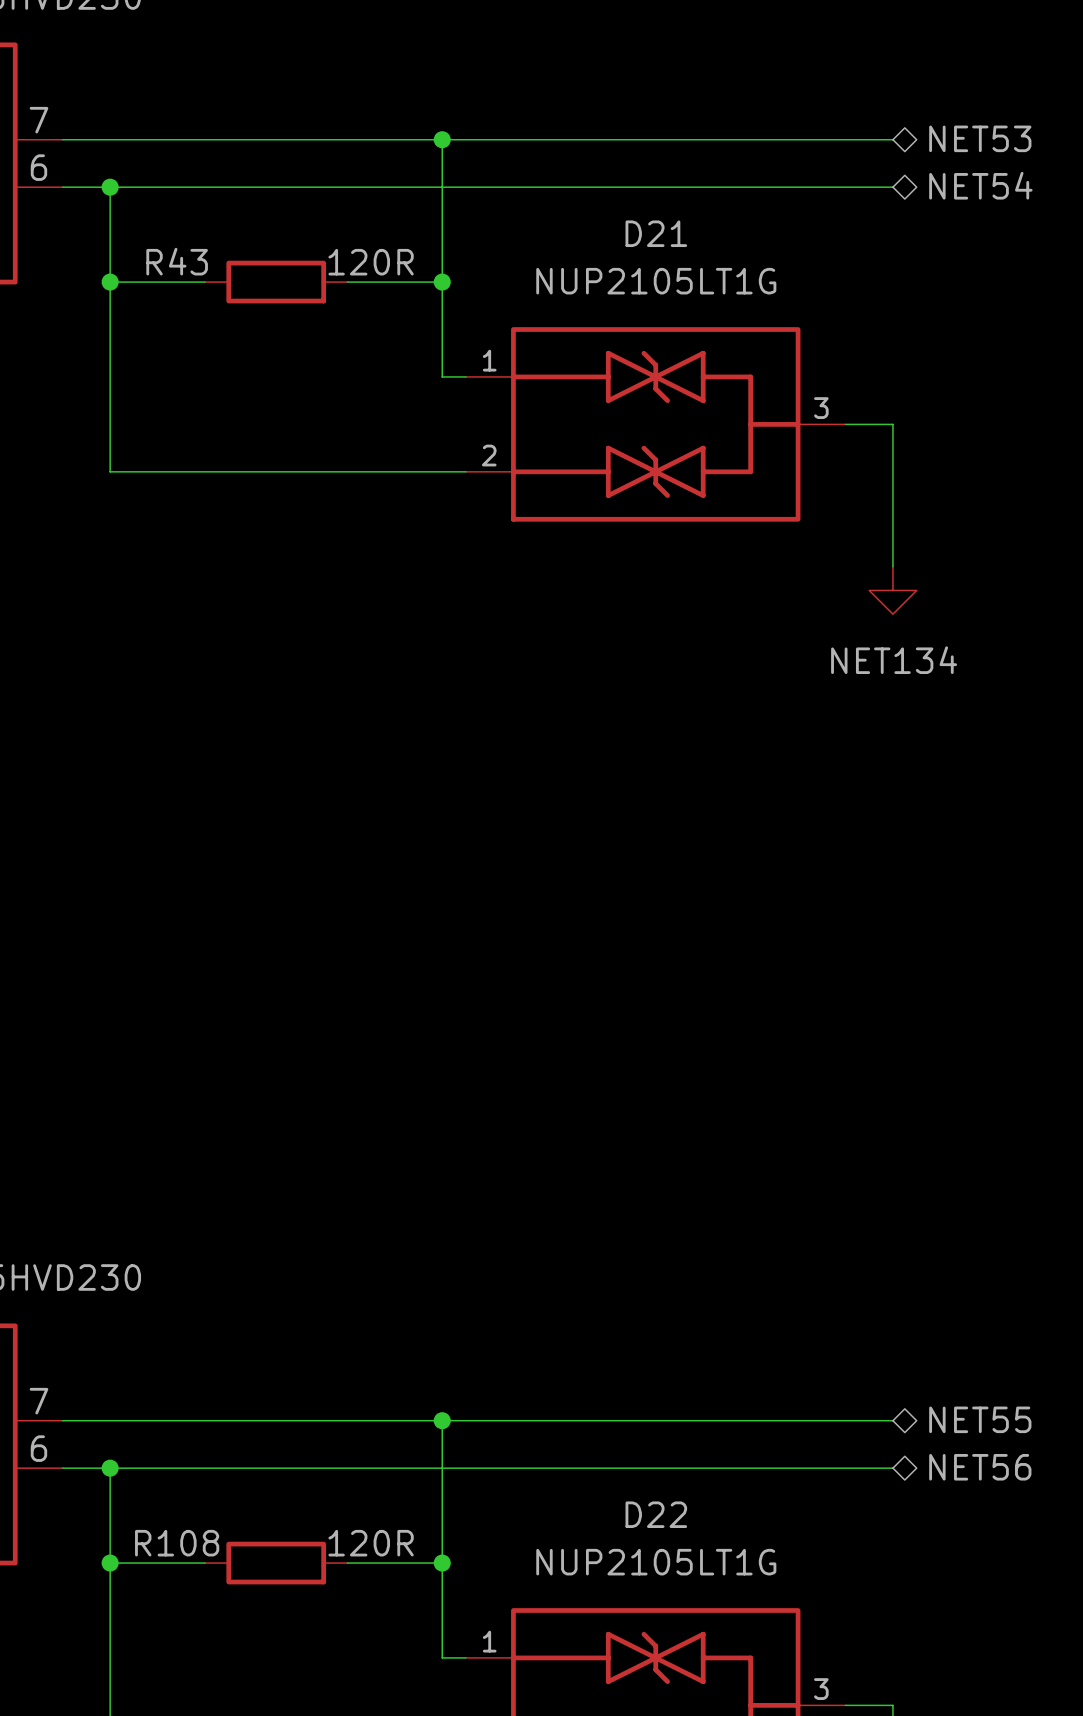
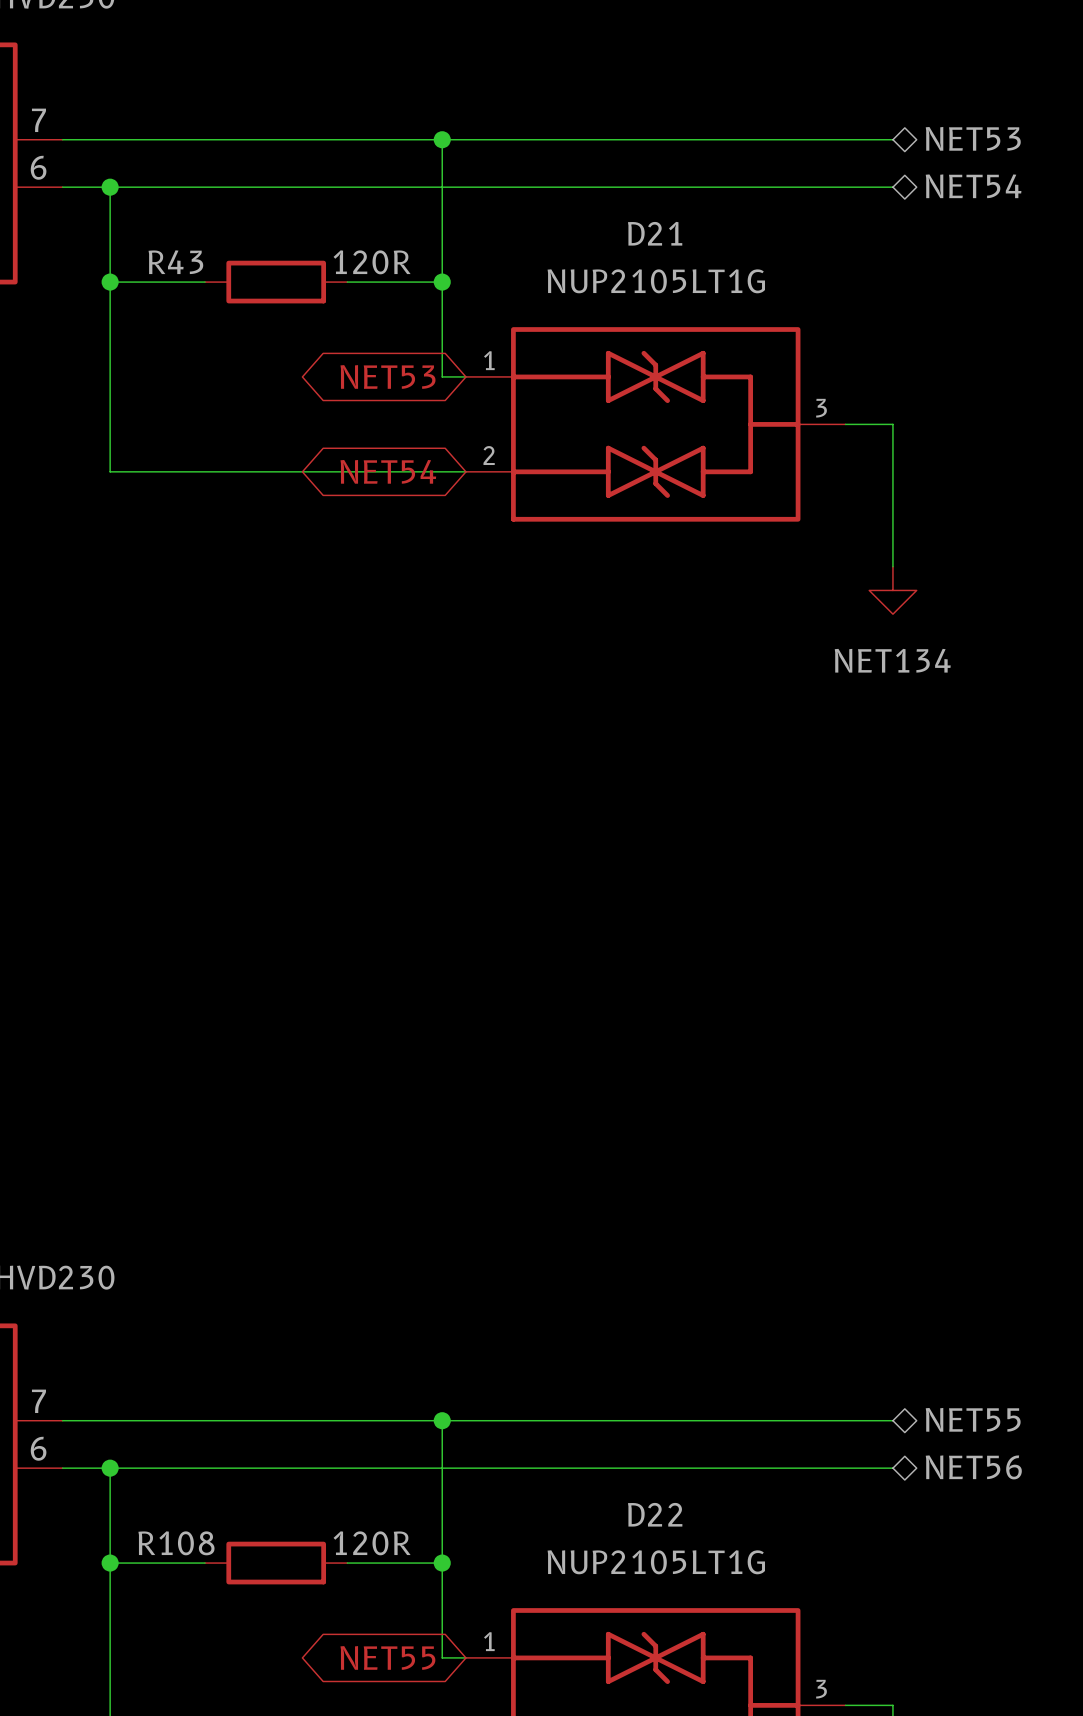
global label: none -> NET53 (388, 376)
global label: none -> NET54 (388, 471)
global label: none -> NET55 (387, 1657)

